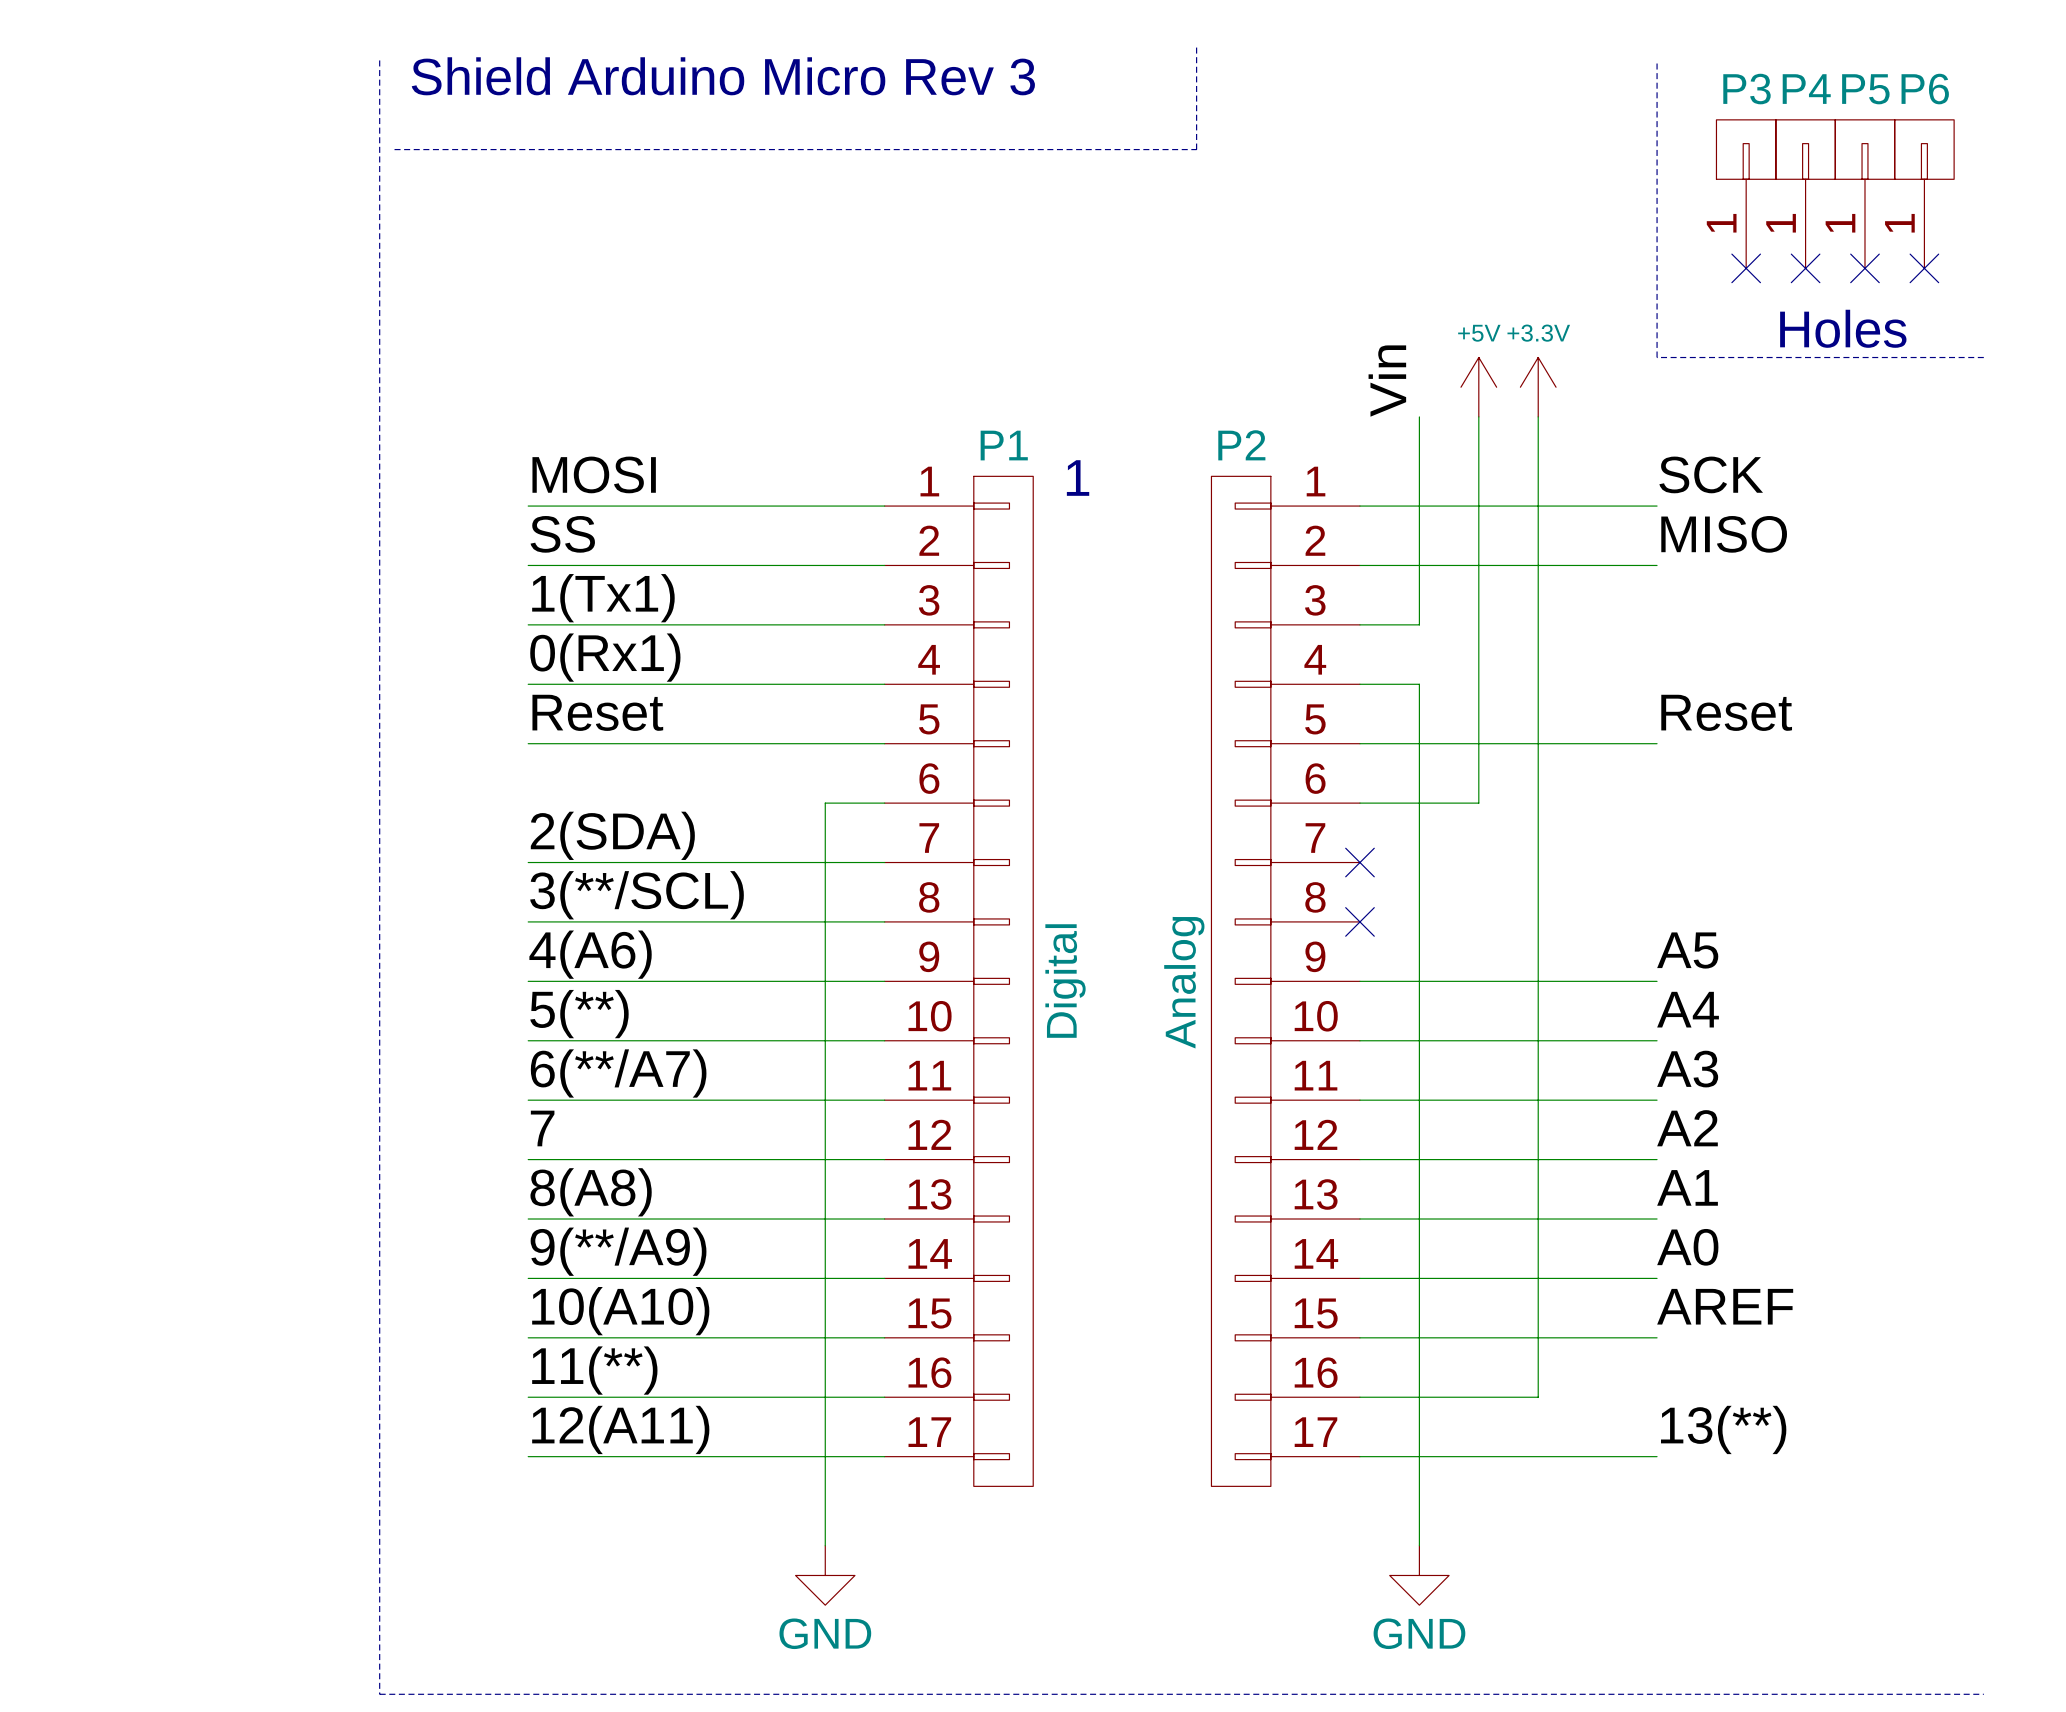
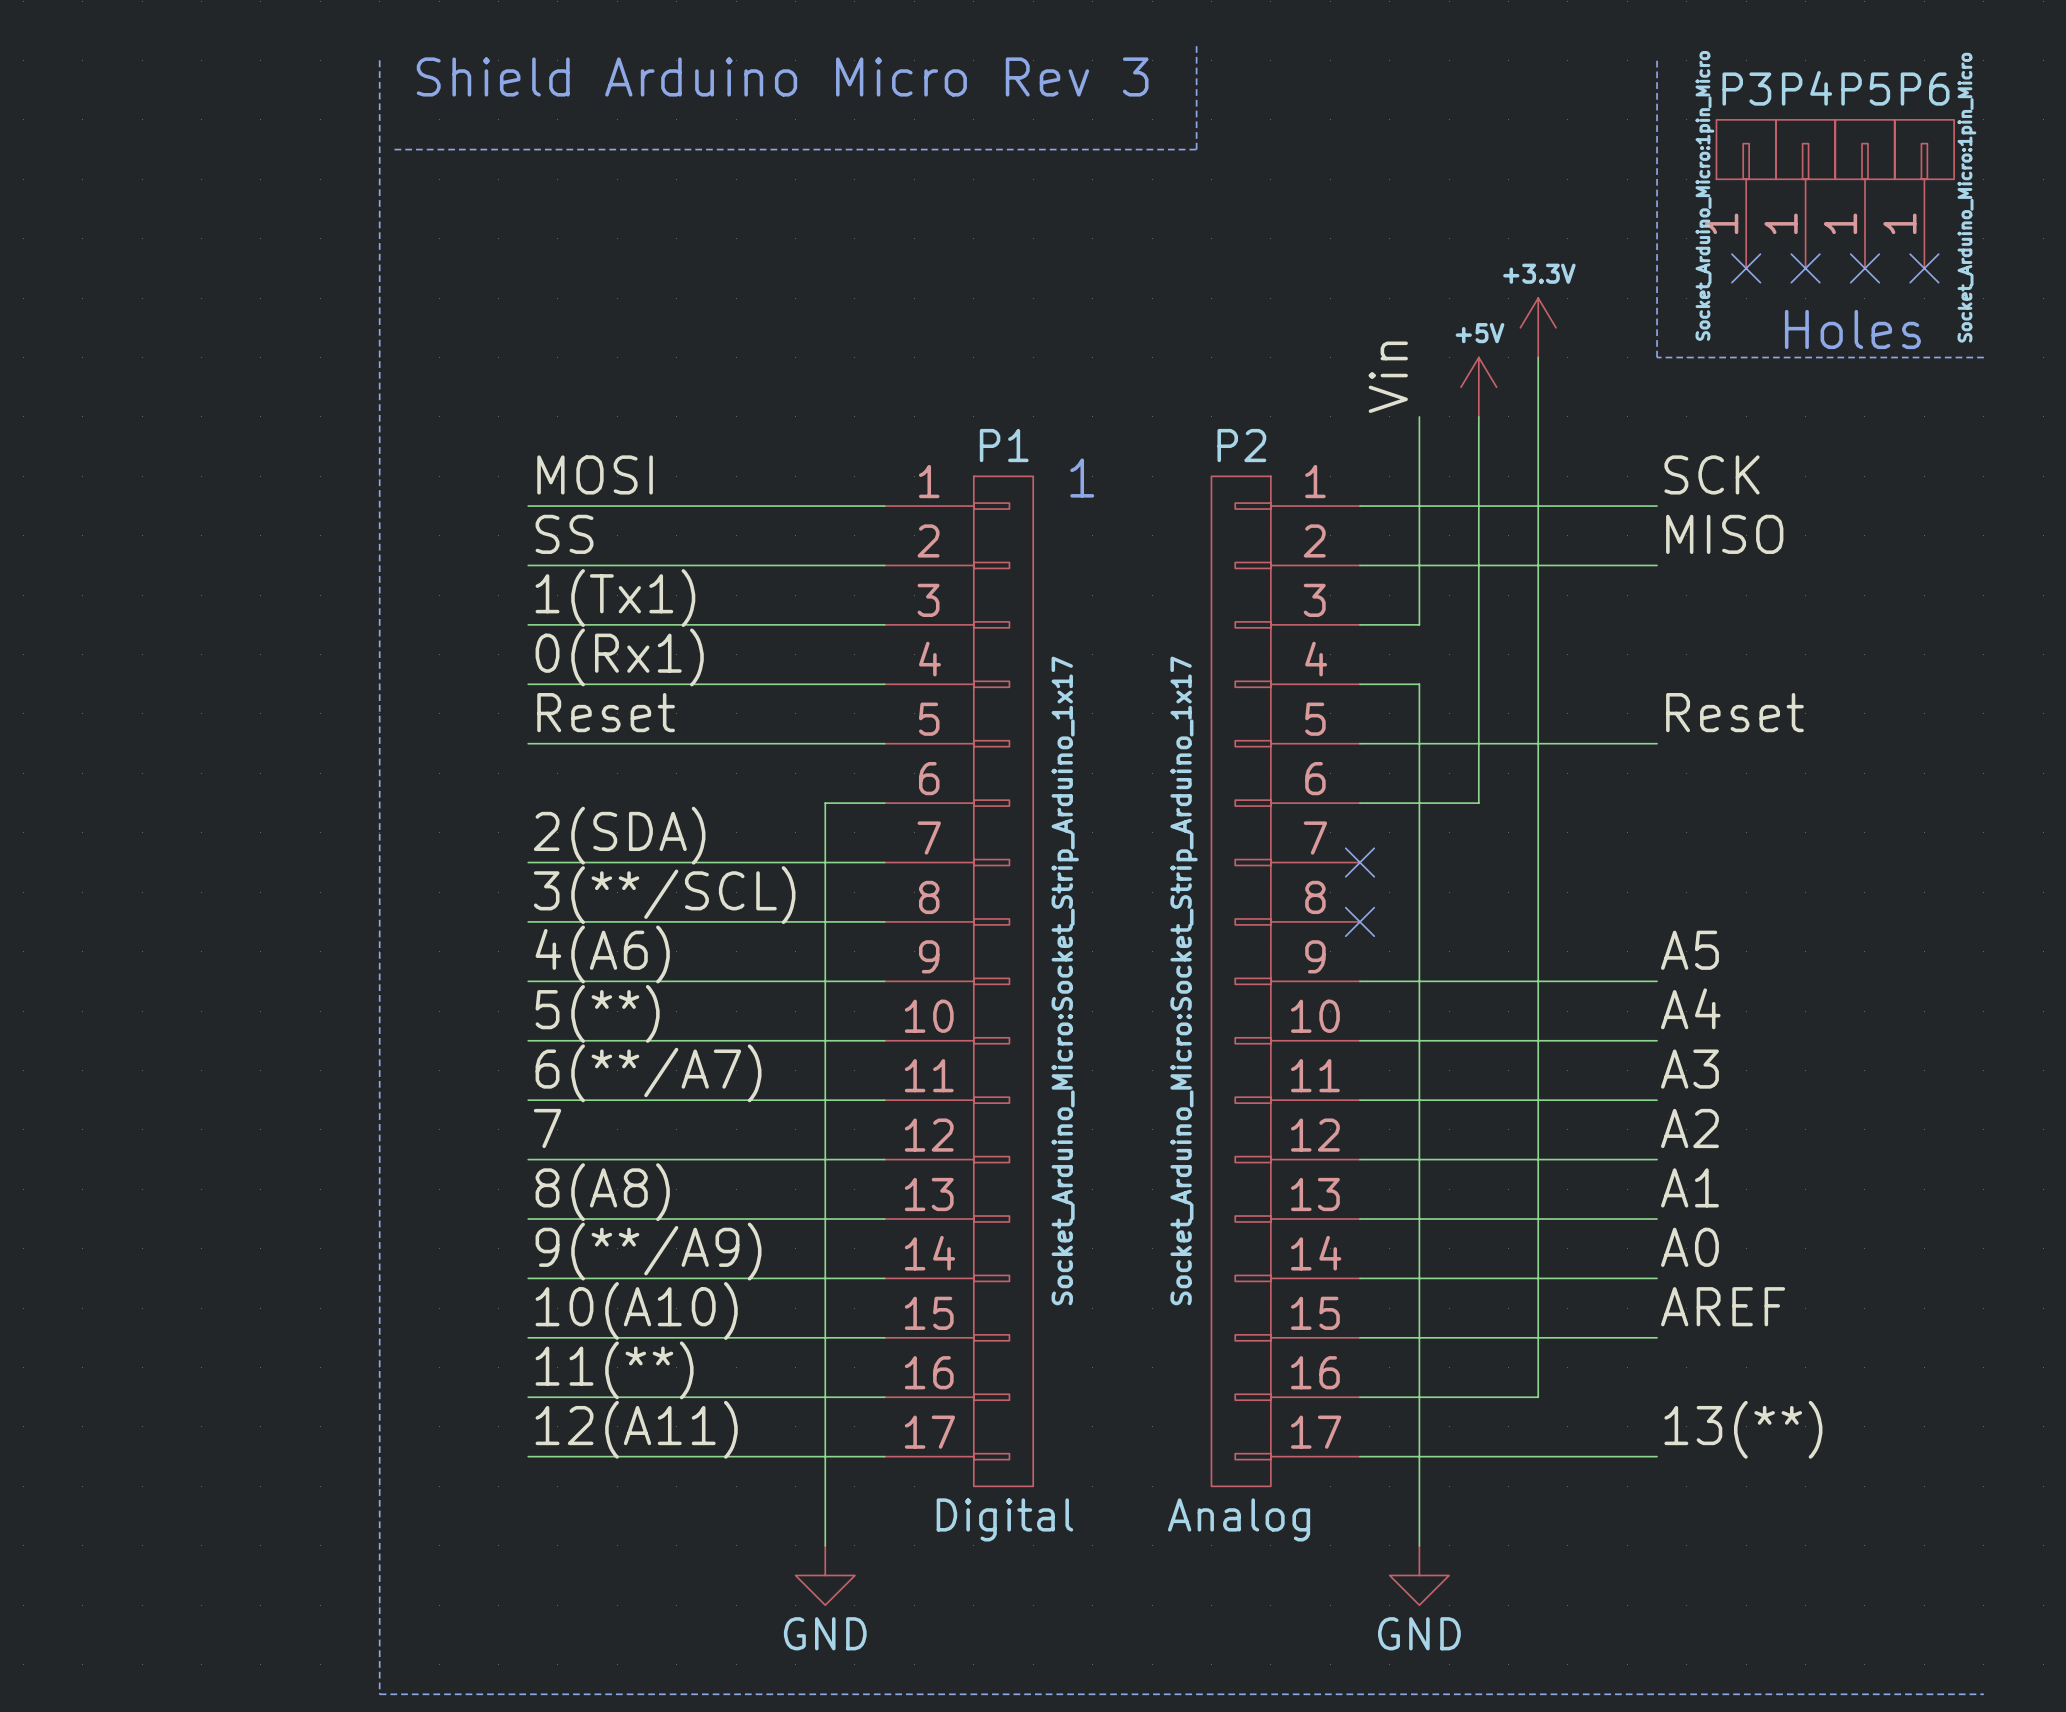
P3 text: none -> Socket_Arduino_Micro:1pin_Micro (1704, 195)
P6 text: none -> Socket_Arduino_Micro:1pin_Micro (1966, 197)
power symbol position: +3.3V (1538, 387) -> +3.3V (1538, 327)
P1 text: none -> Socket_Arduino_Micro:Socket_Strip_Arduino_1x17 (1065, 980)
P1 value rotation: 0° (1065, 981) -> 90° clockwise (1004, 1519)
P1 value position: Digital (1065, 981) -> Digital (1004, 1519)
P2 text: none -> Socket_Arduino_Micro:Socket_Strip_Arduino_1x17 (1184, 980)
P2 value rotation: 0° (1184, 982) -> 90° clockwise (1239, 1519)
P2 value position: Analog (1184, 982) -> Analog (1239, 1519)

